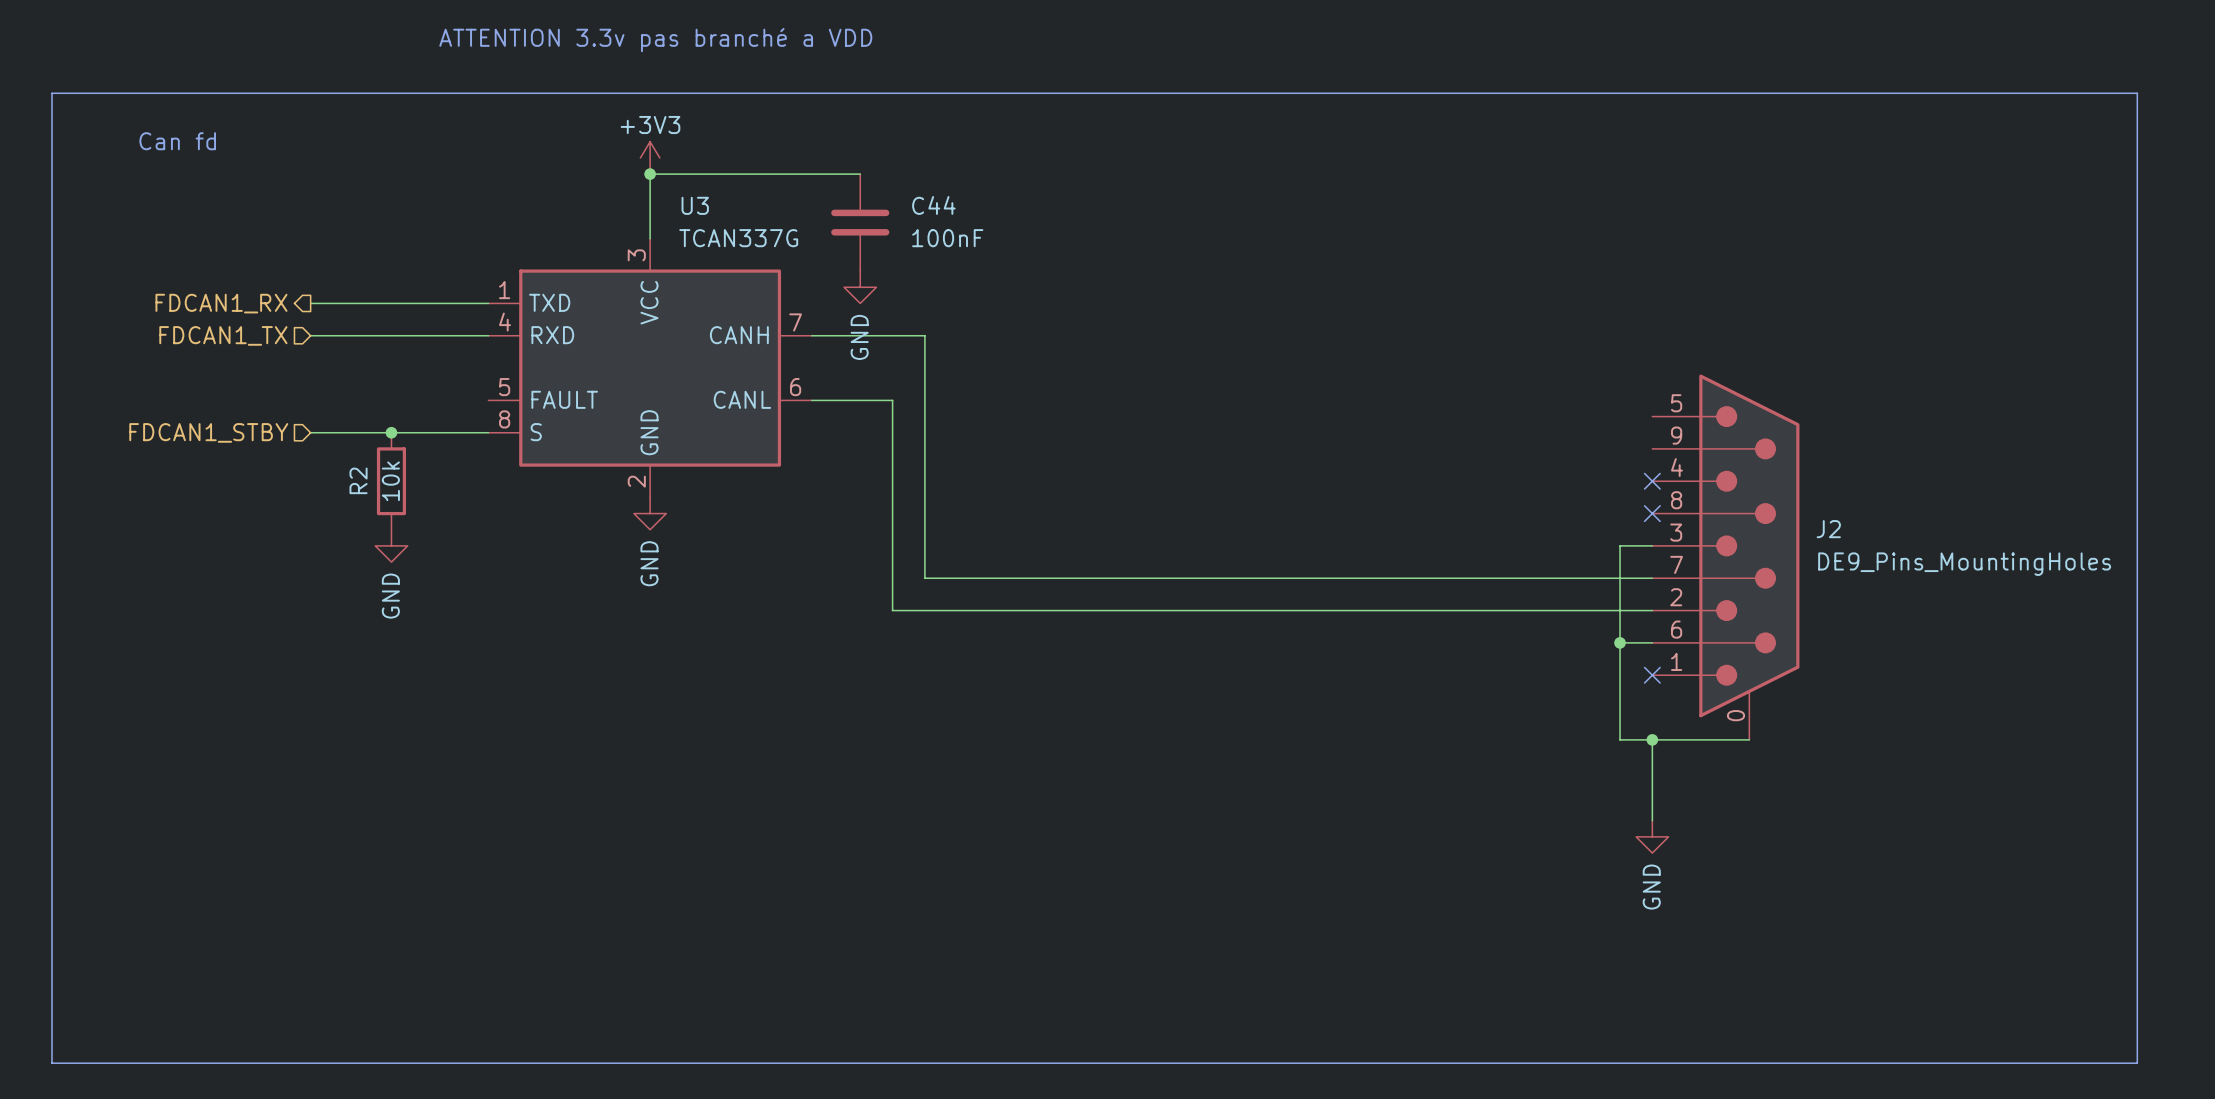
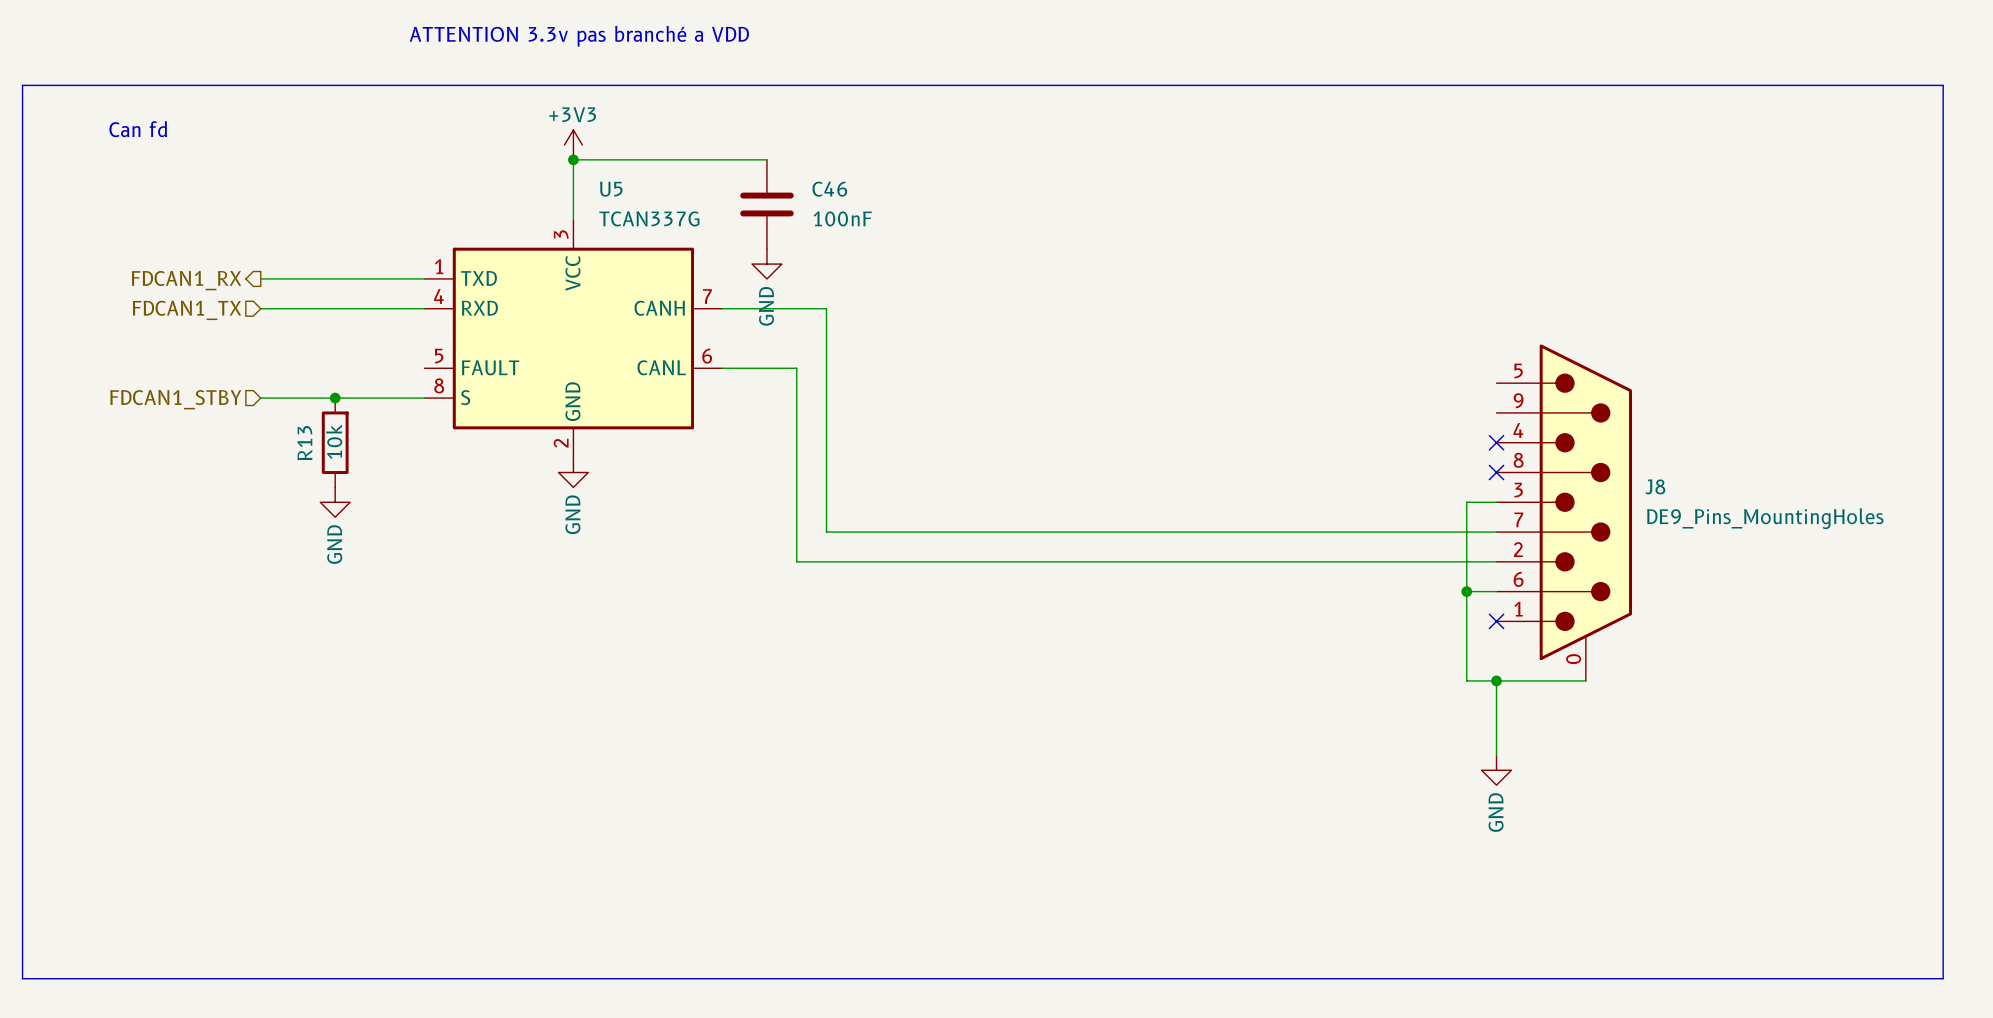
U3 name: U3 (695, 205) -> U5 (611, 189)
C44 name: C44 (933, 205) -> C46 (829, 189)
R2 name: R2 (358, 480) -> R13 (304, 443)
J2 name: J2 (1828, 529) -> J8 (1655, 486)

